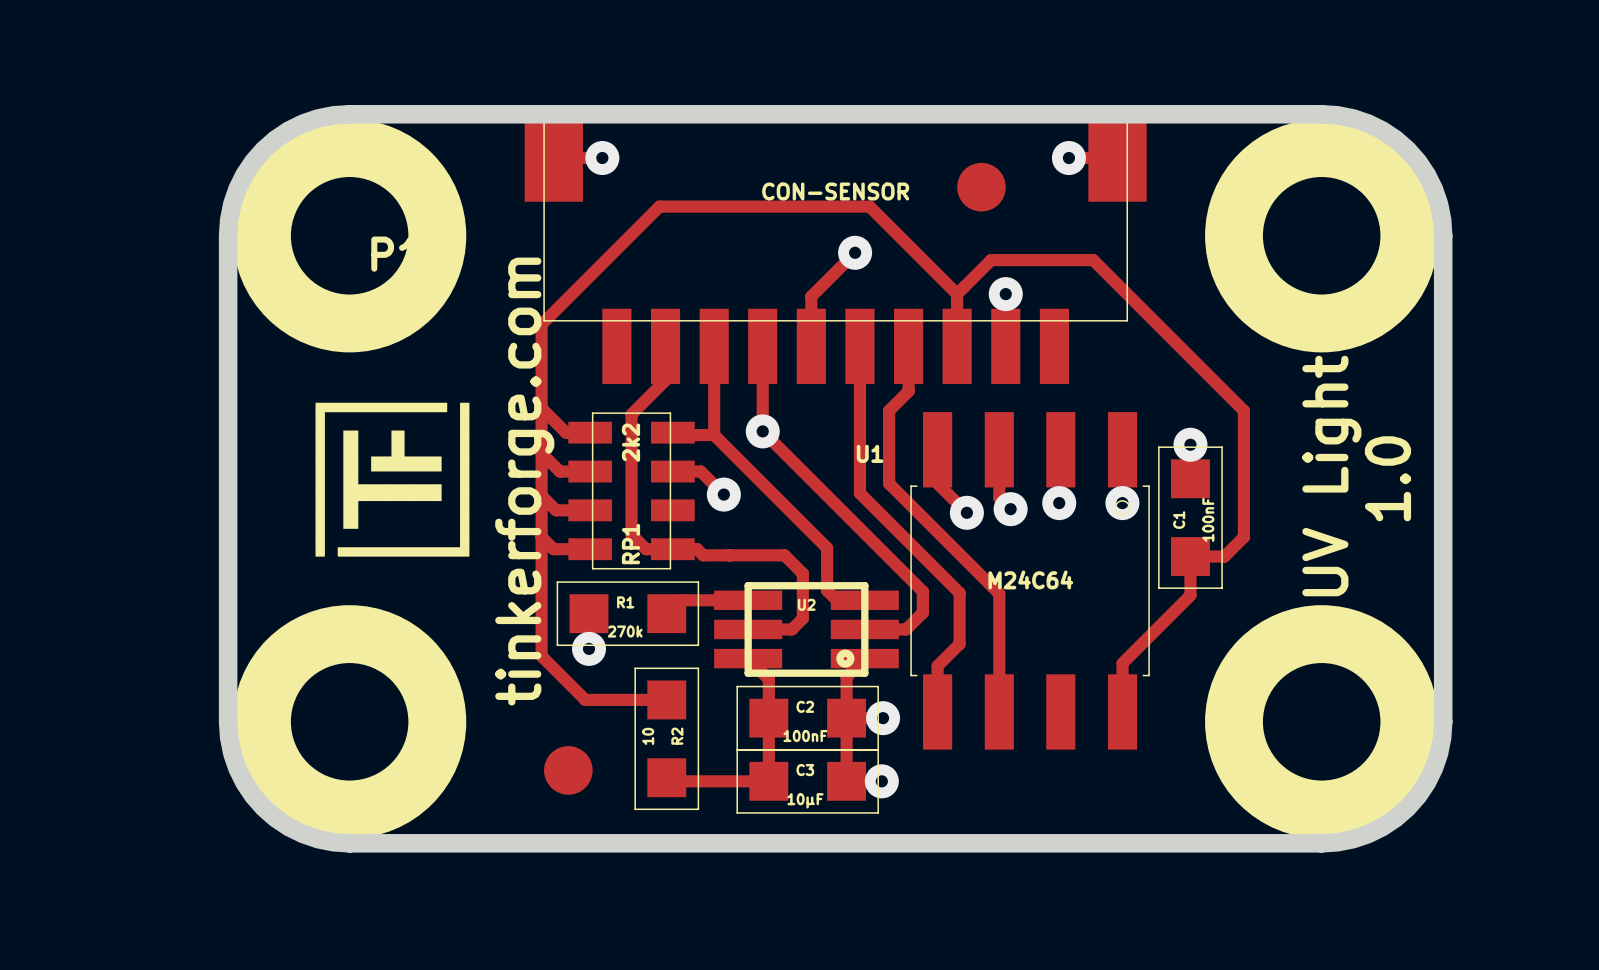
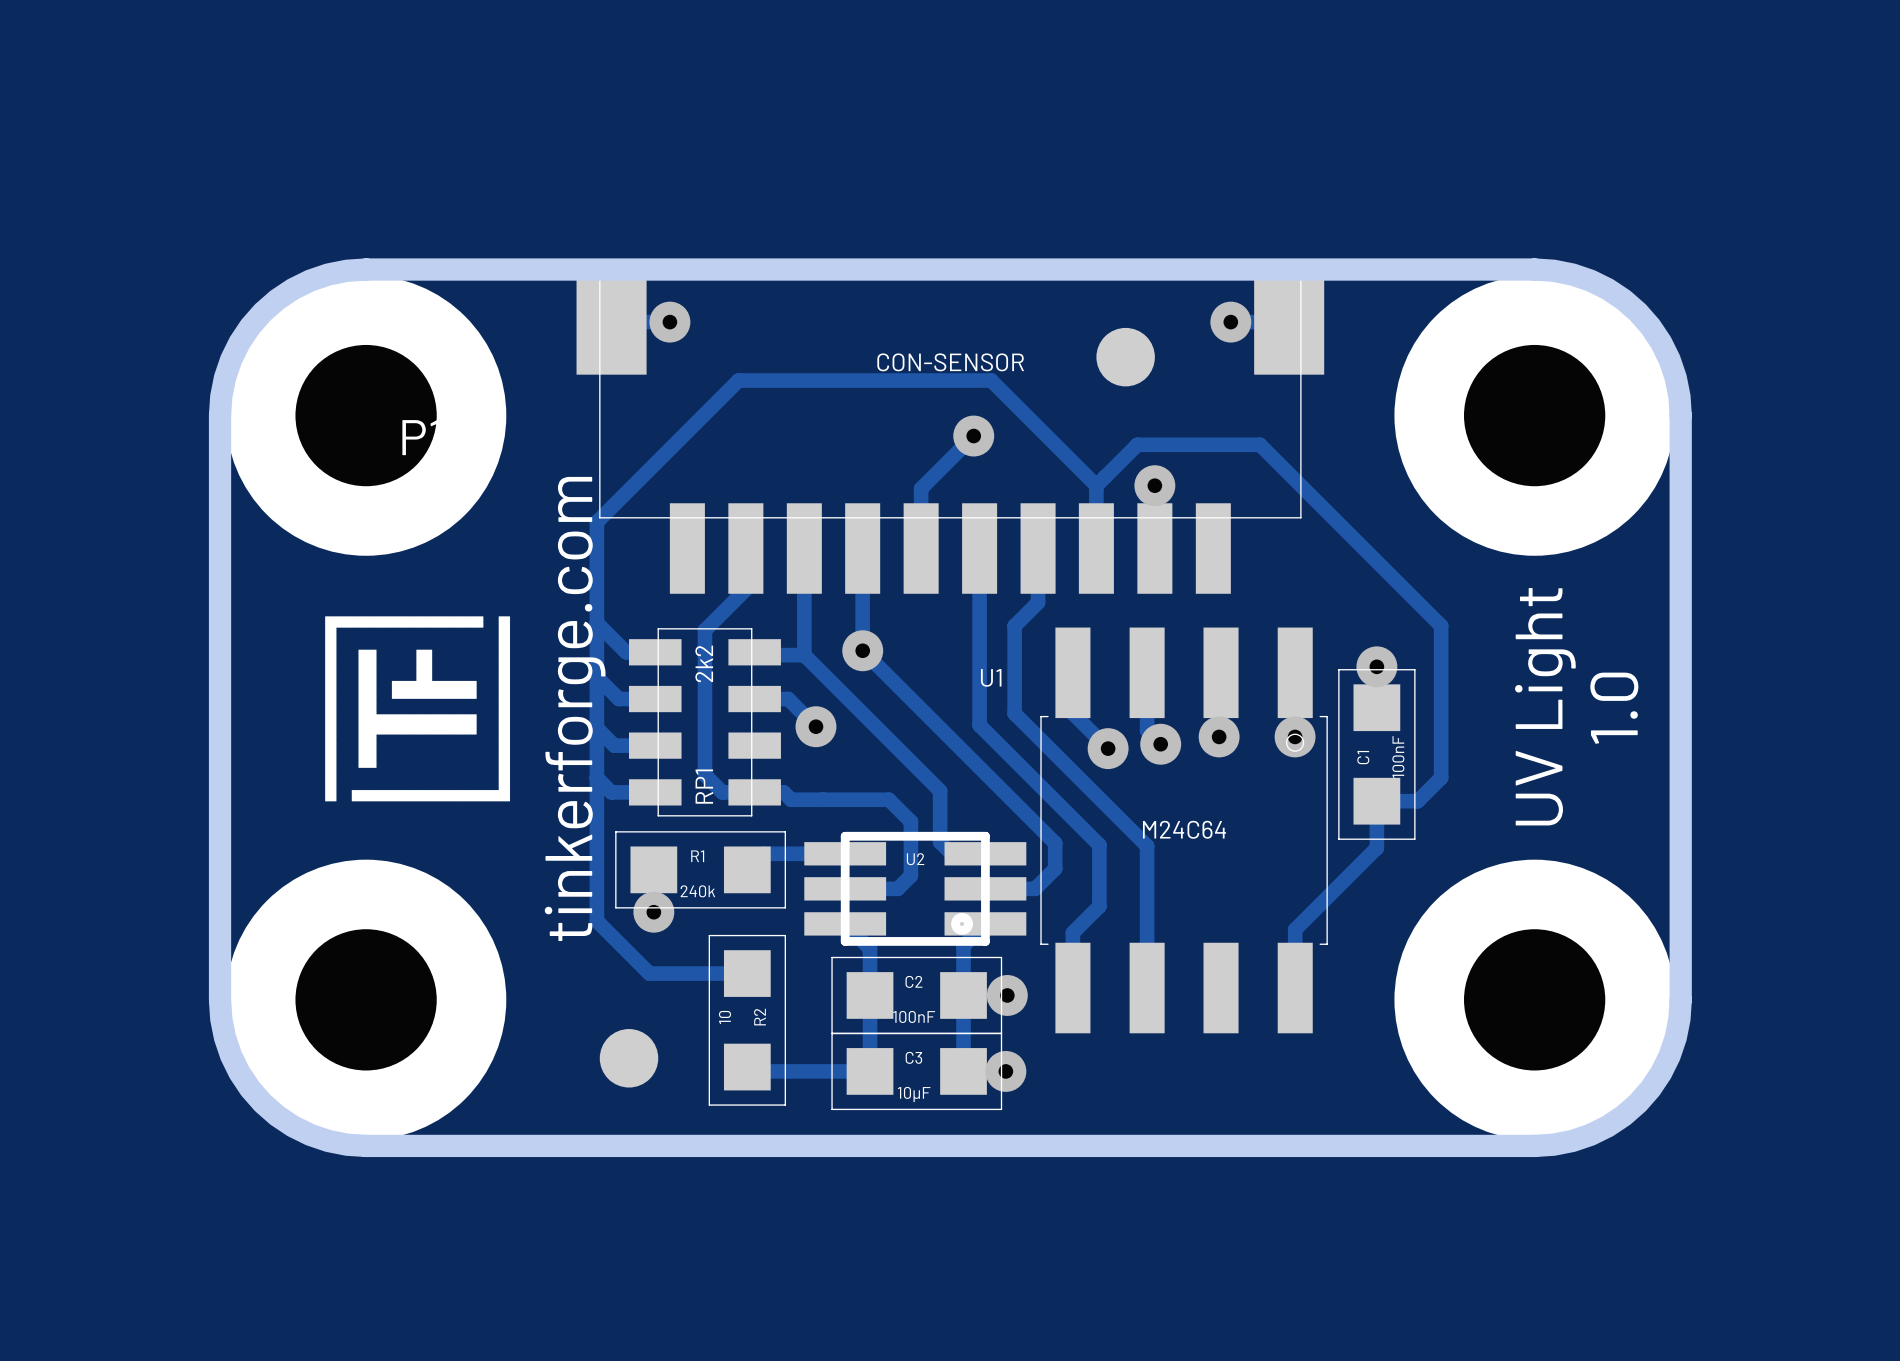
R1 value: 270k (625, 631) -> 240k (697, 891)

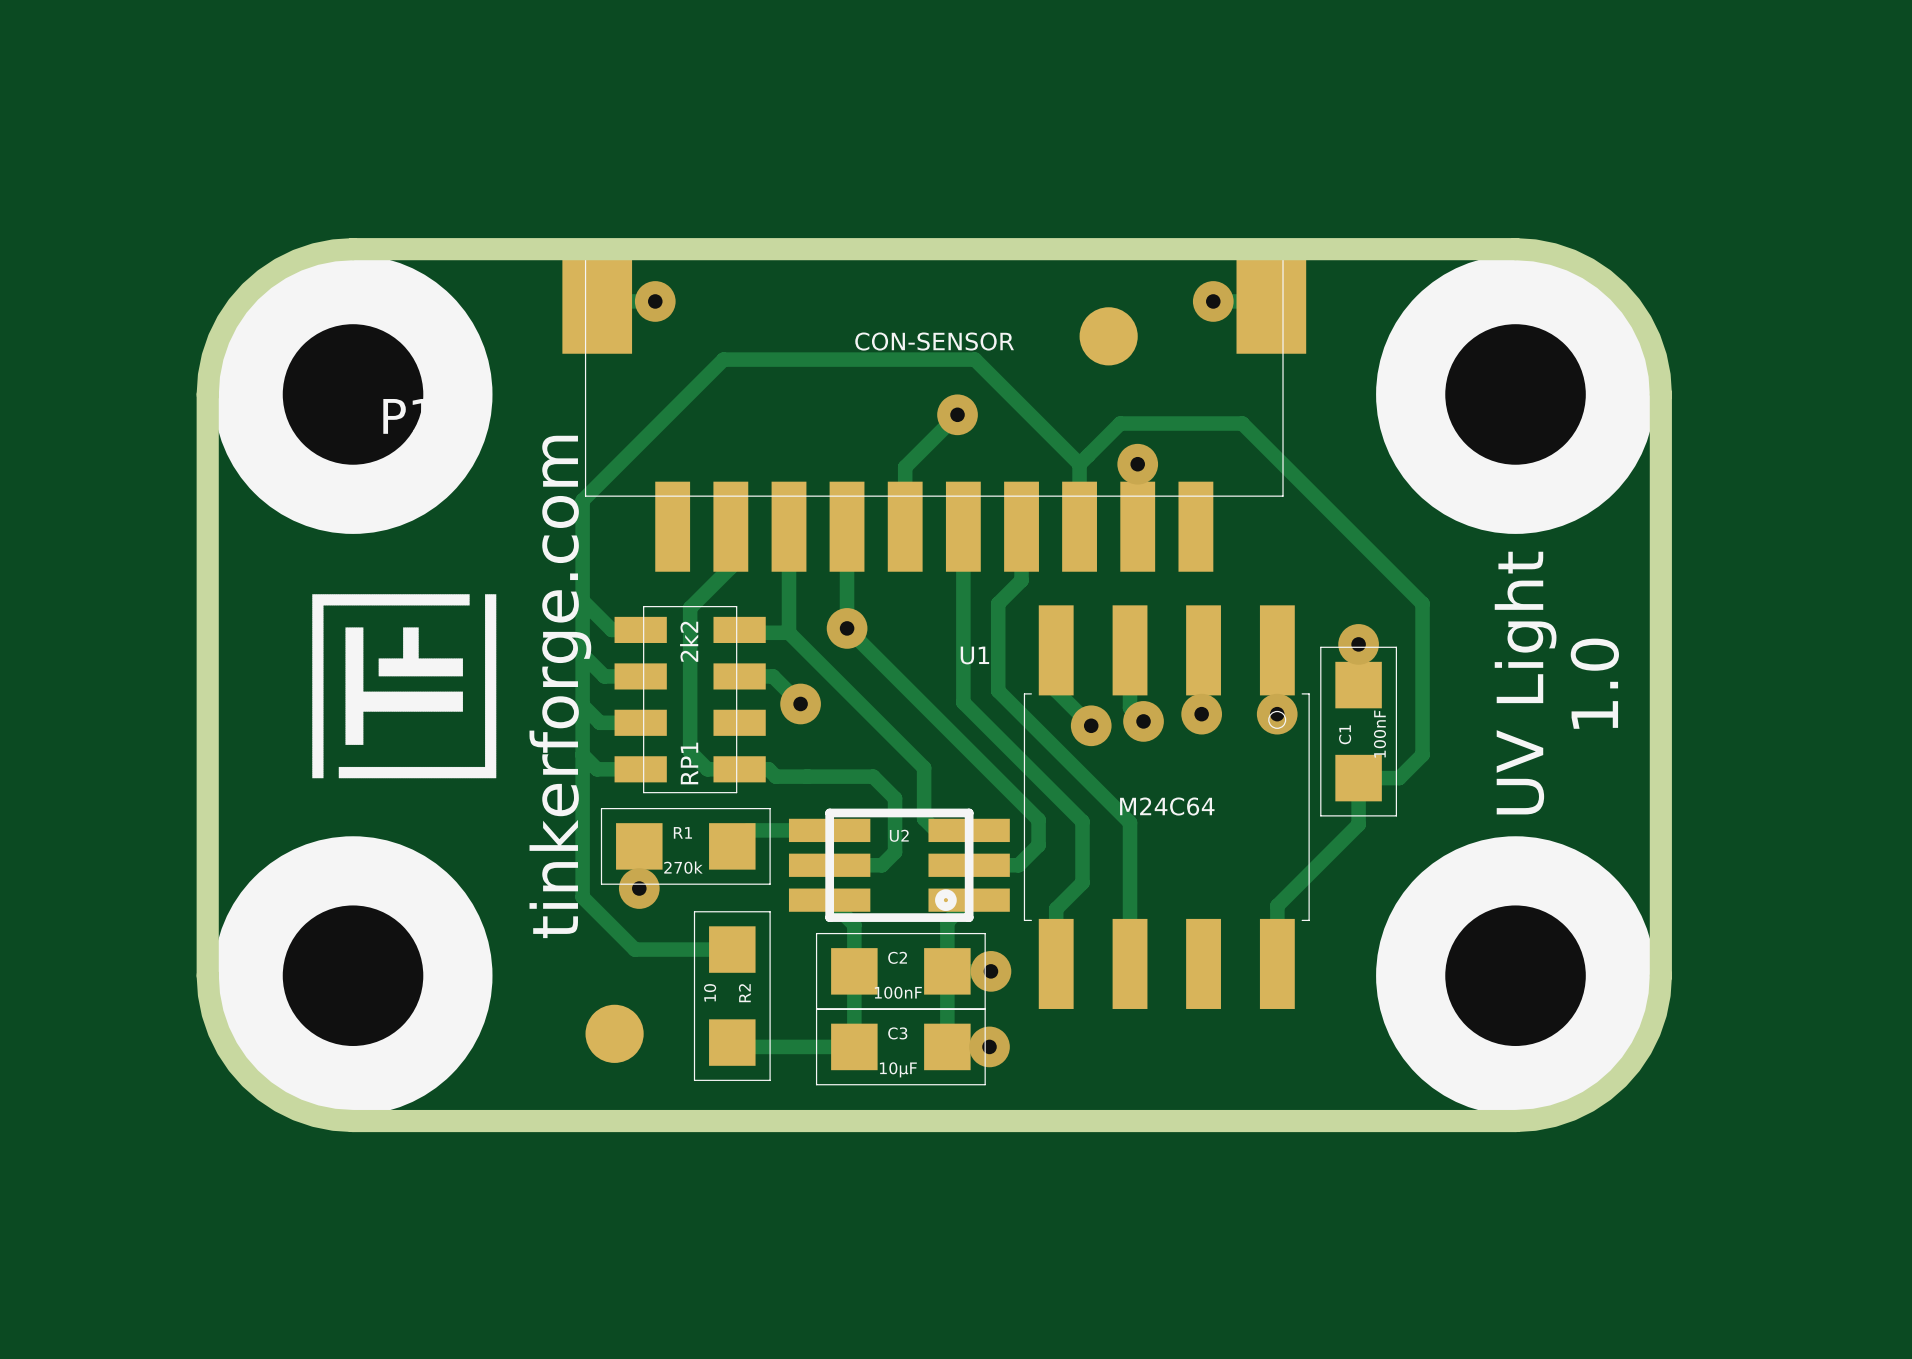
R1 value: 240k (697, 891) -> 270k (683, 867)

